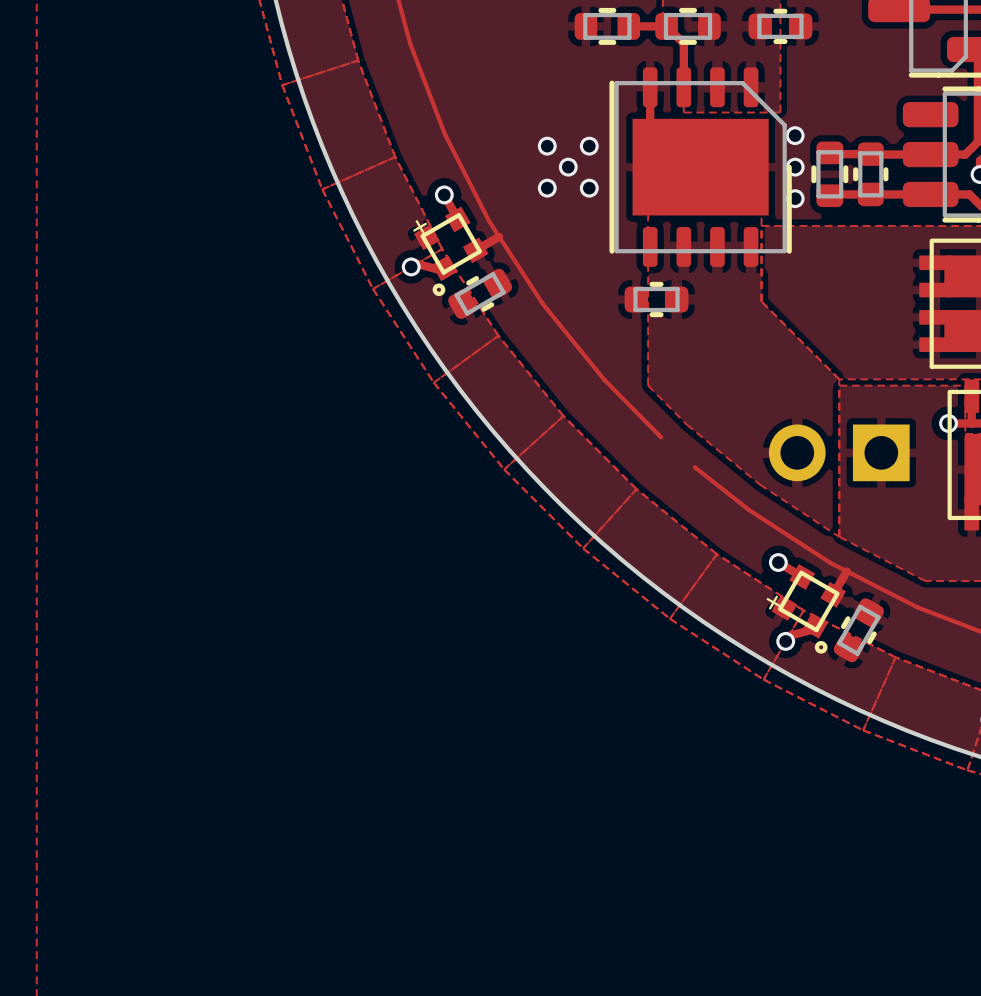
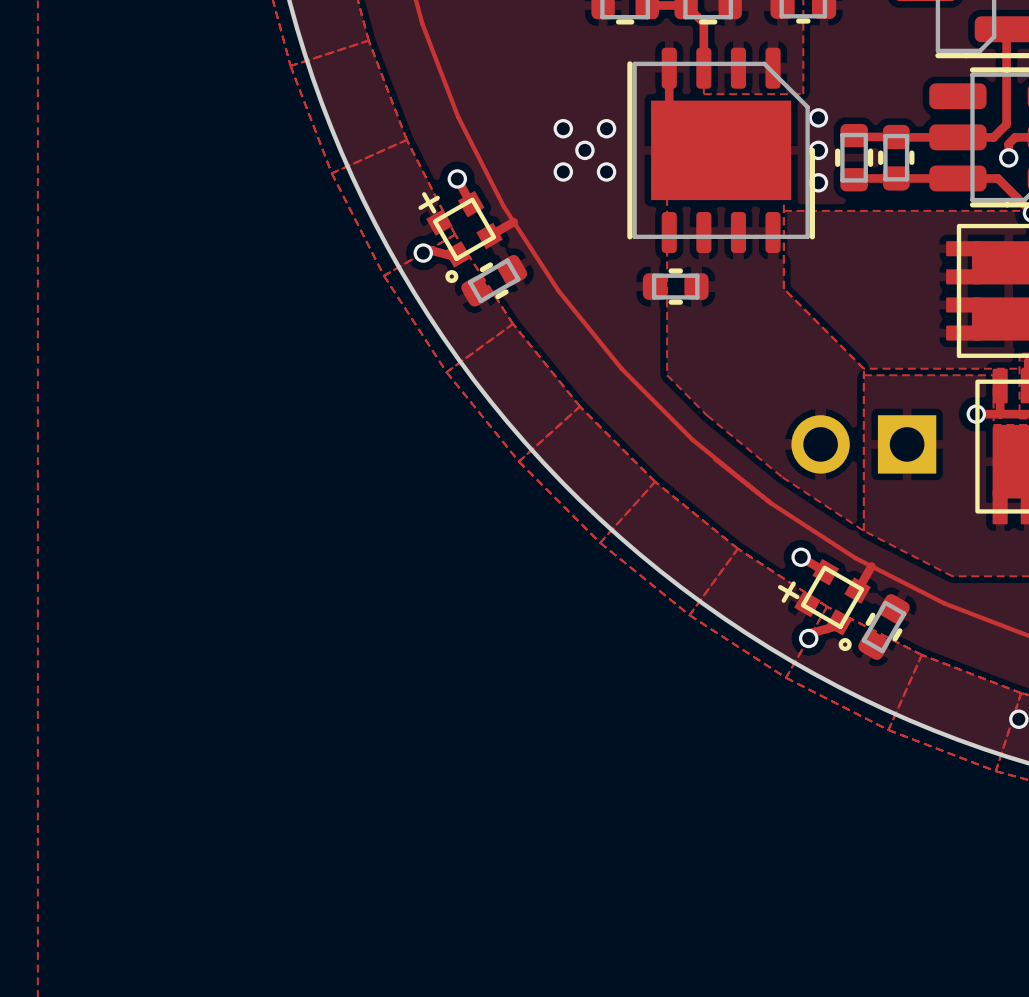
track: (604, 379) (661, 437) -> (621, 368) (692, 440) (770, 503)

